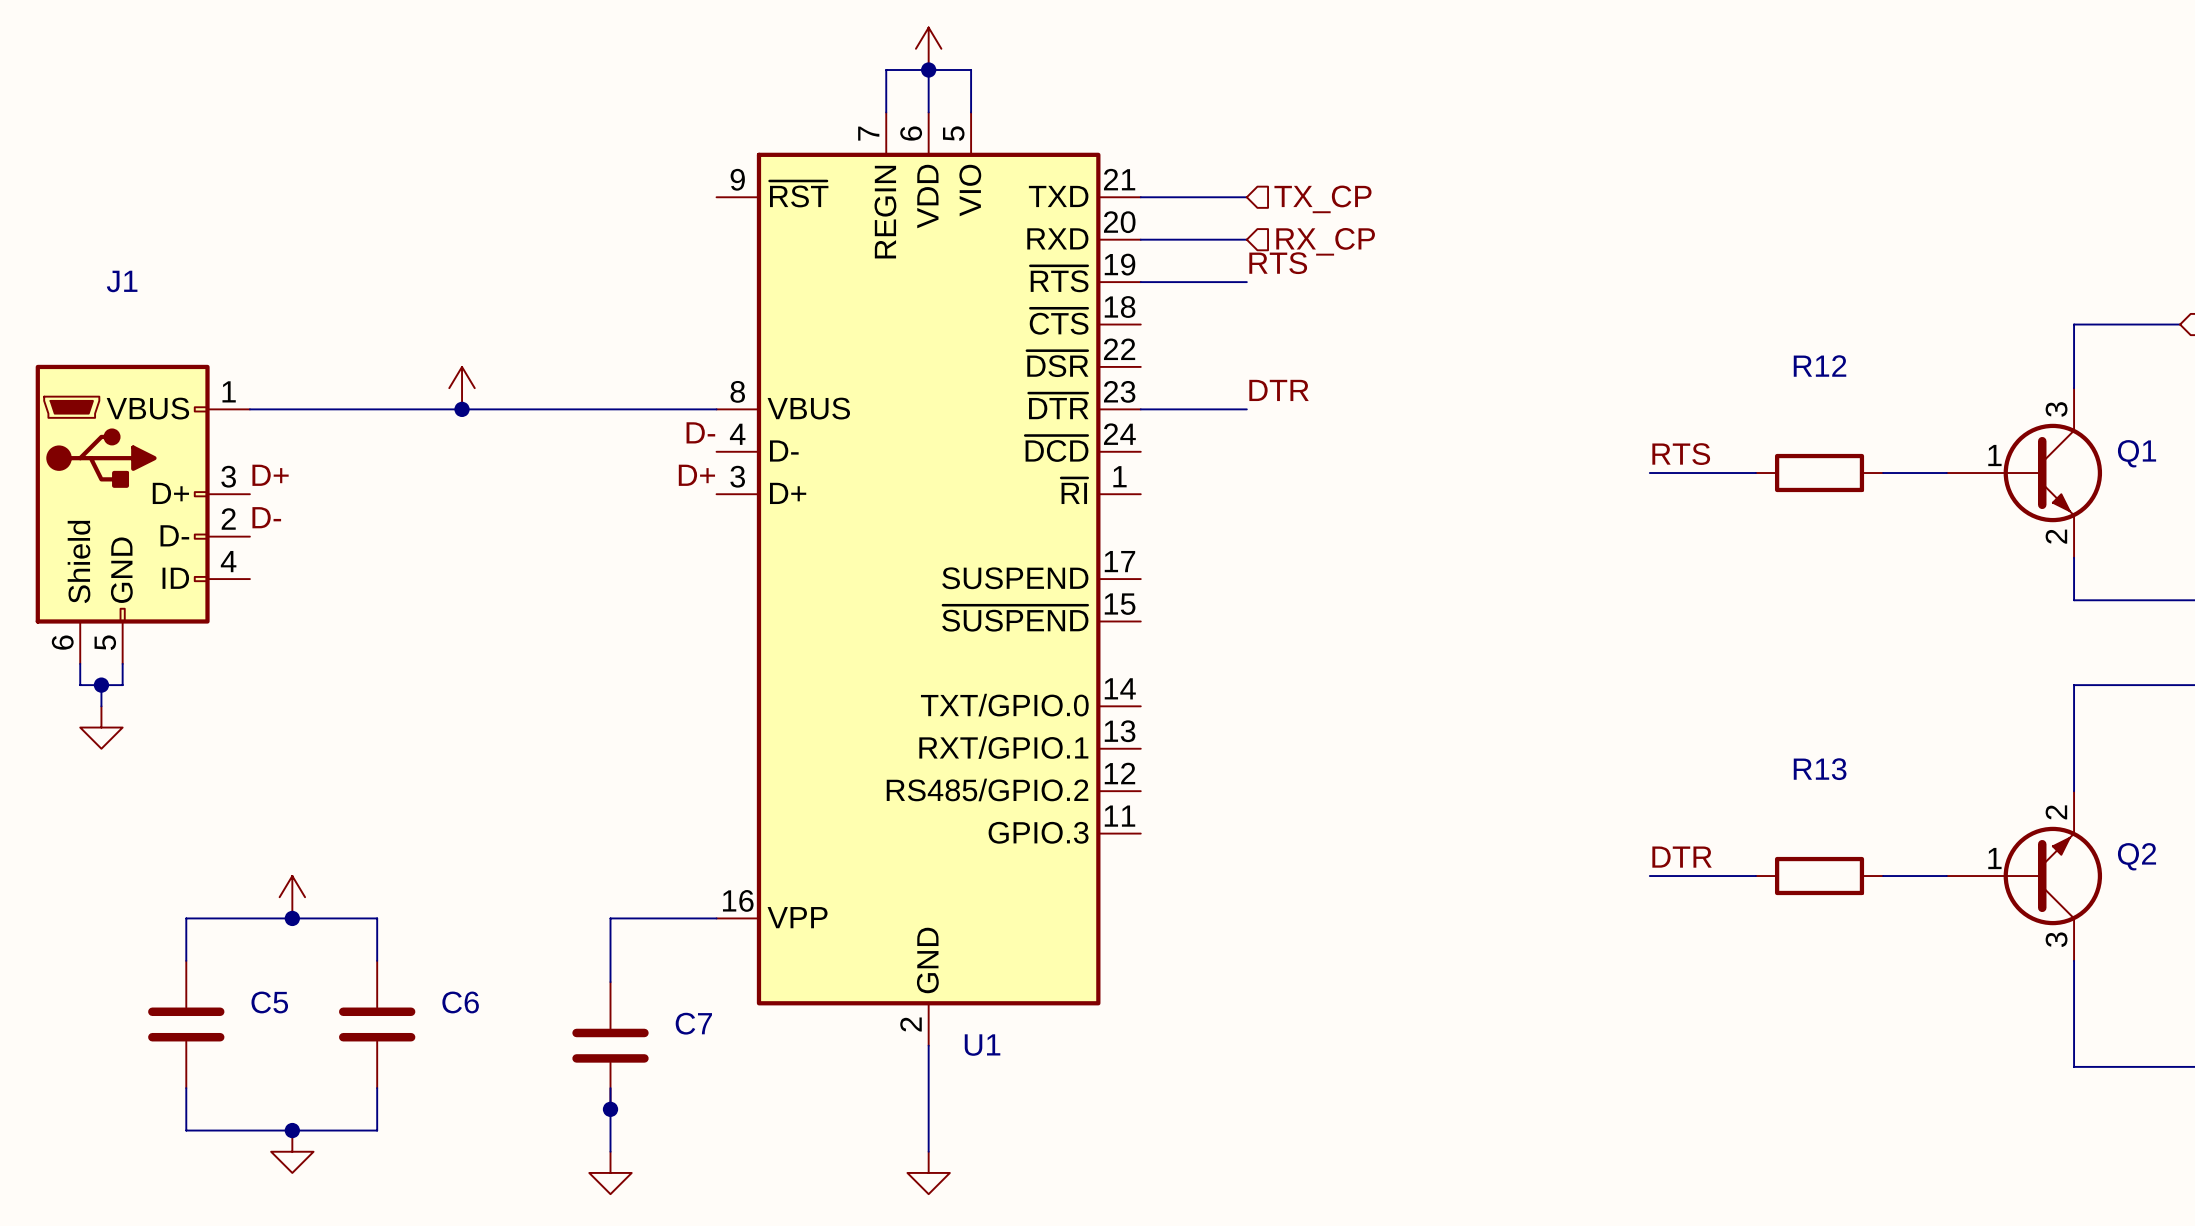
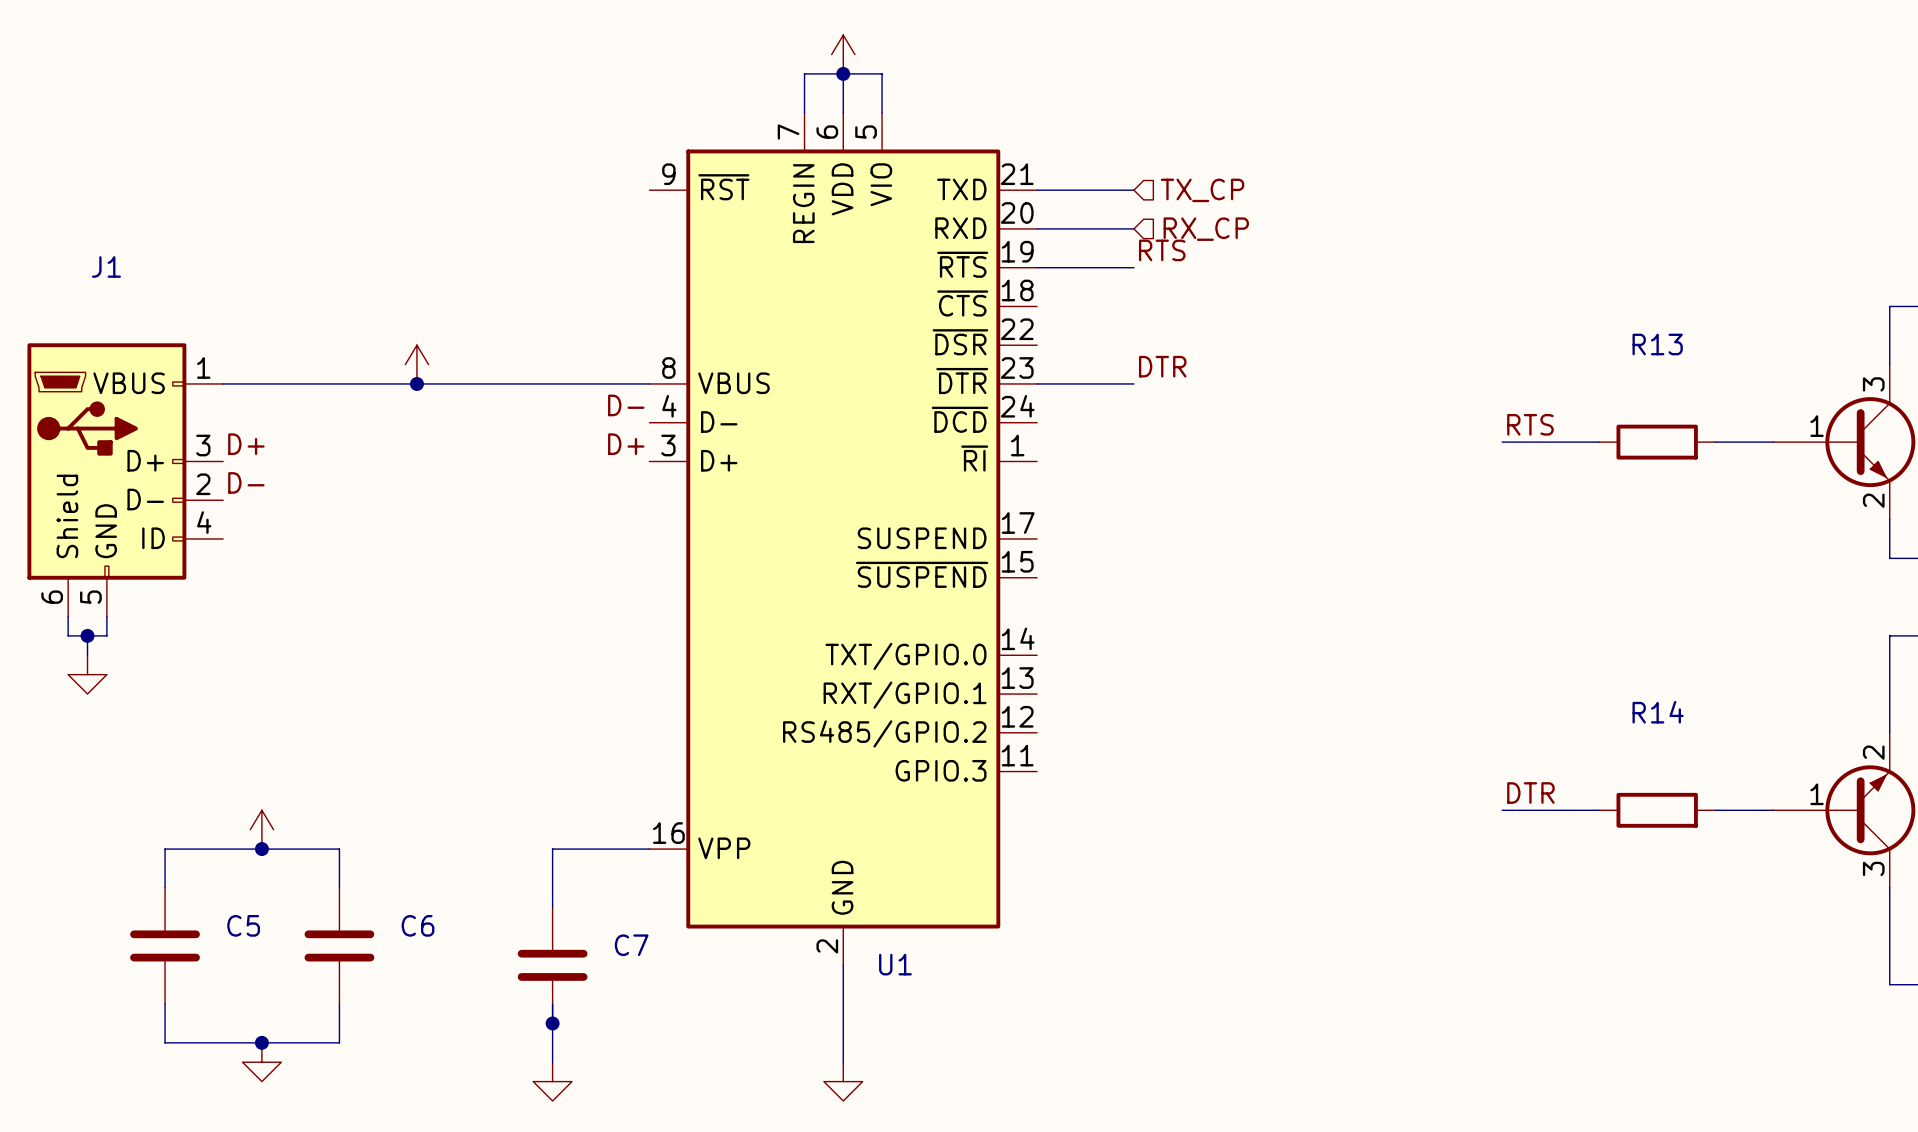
R12 name: R12 (1820, 366) -> R13 (1657, 344)
R13 name: R13 (1820, 769) -> R14 (1658, 712)

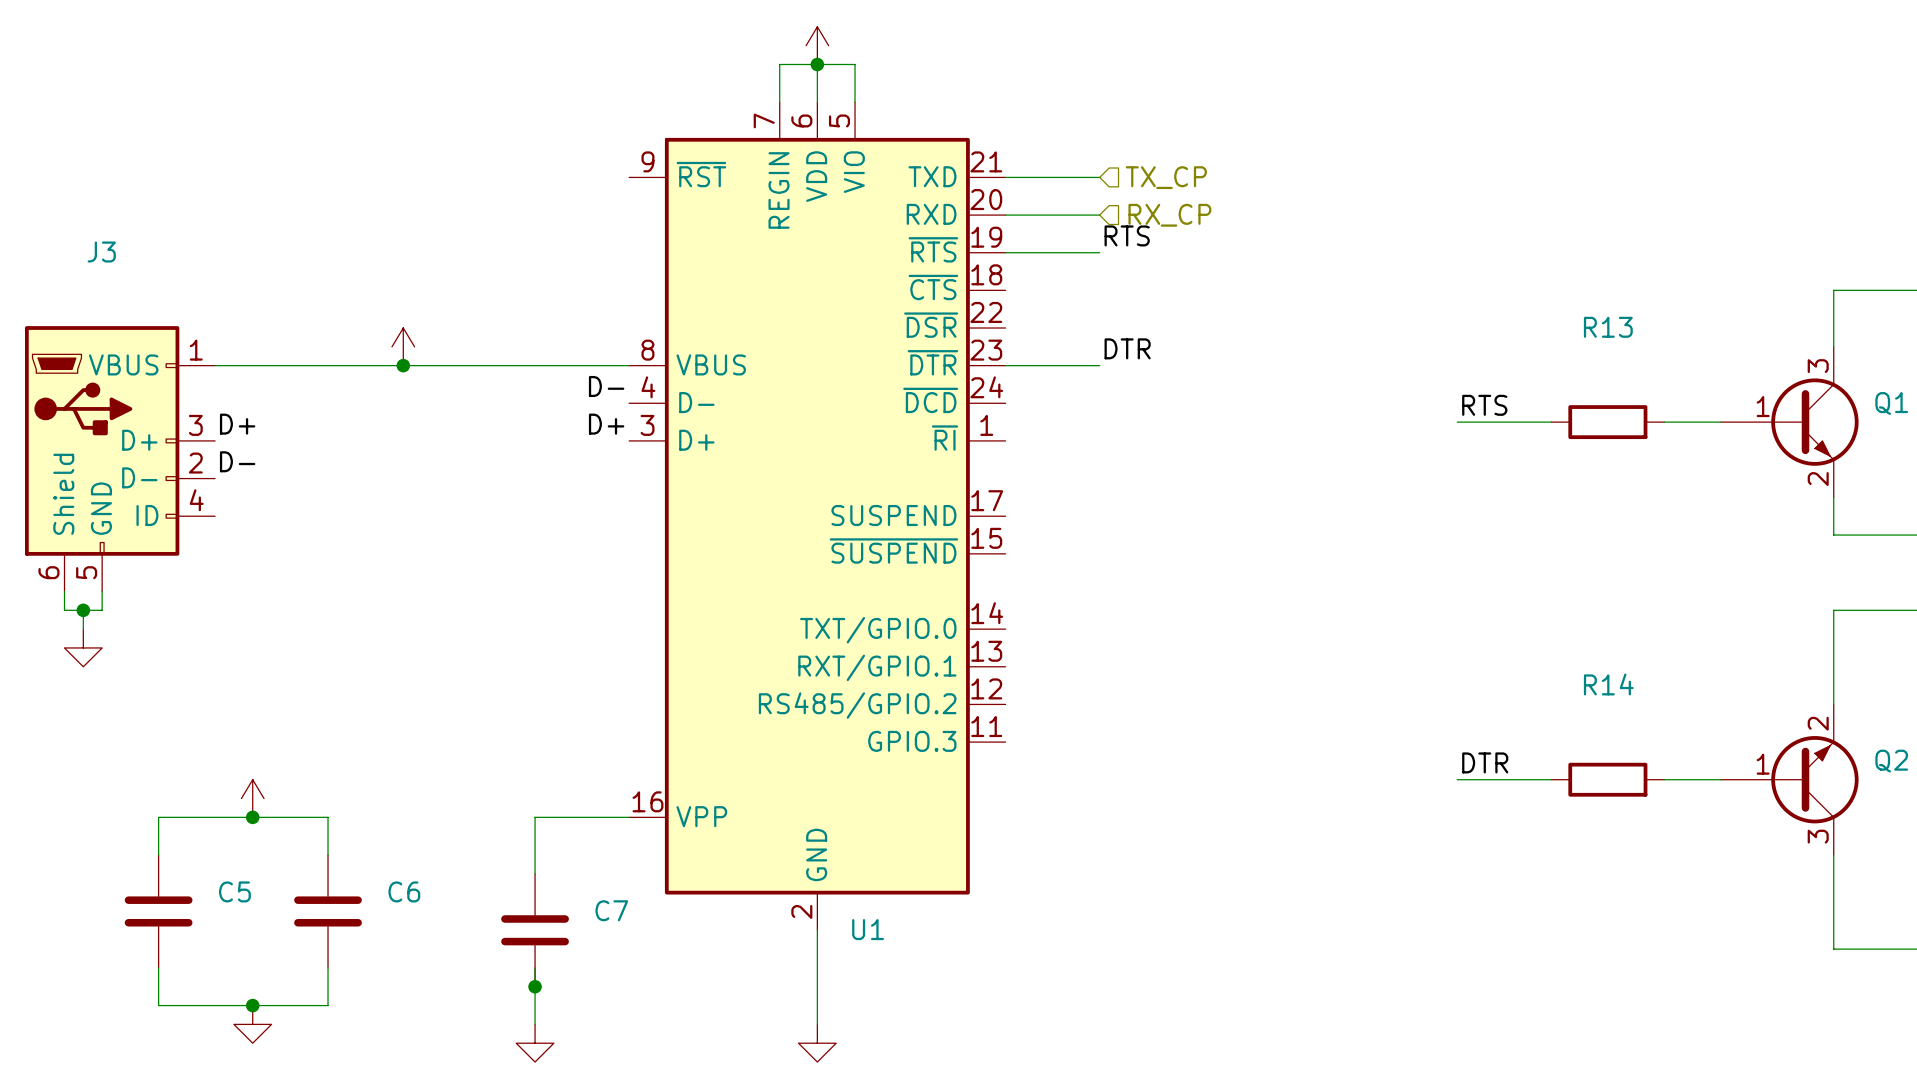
J1 name: J1 (106, 266) -> J3 (101, 252)

